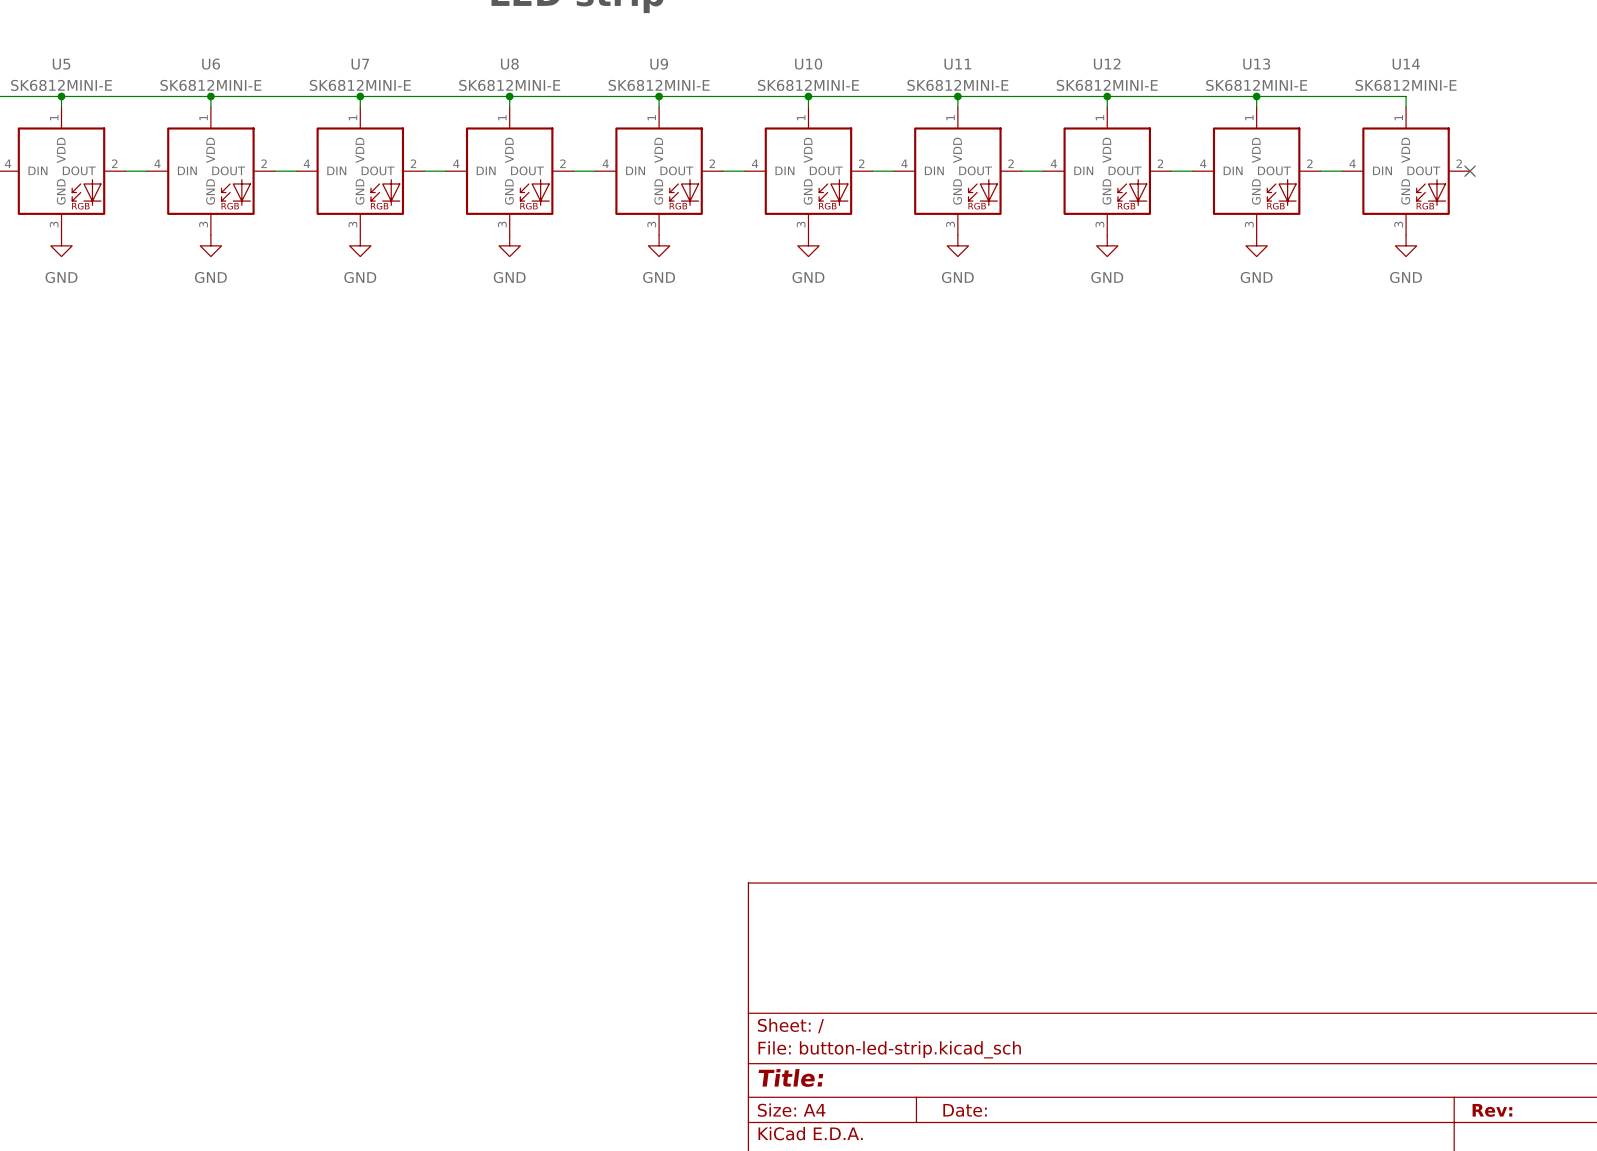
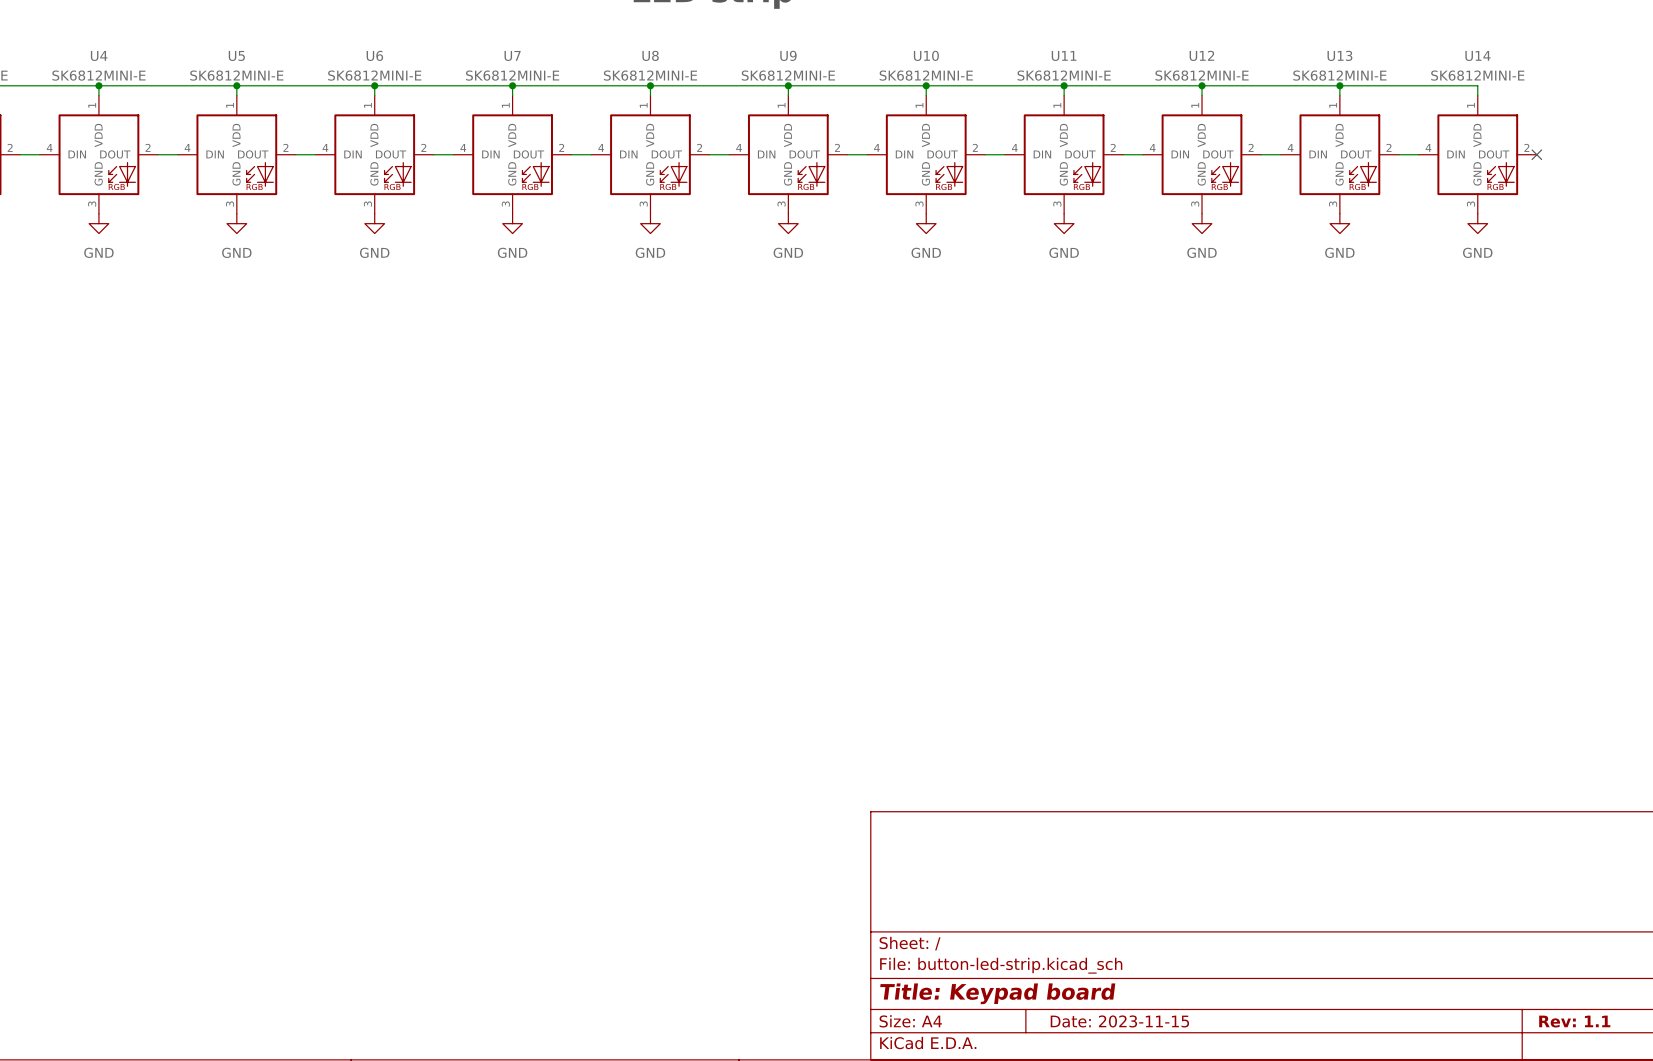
title block: Title: (790, 1077) -> Title: Keypad board (997, 993)
title block: Date: (965, 1110) -> Date: 2023-11-15 (1119, 1021)
title block: Rev: (1492, 1110) -> Rev: 1.1 (1574, 1021)

